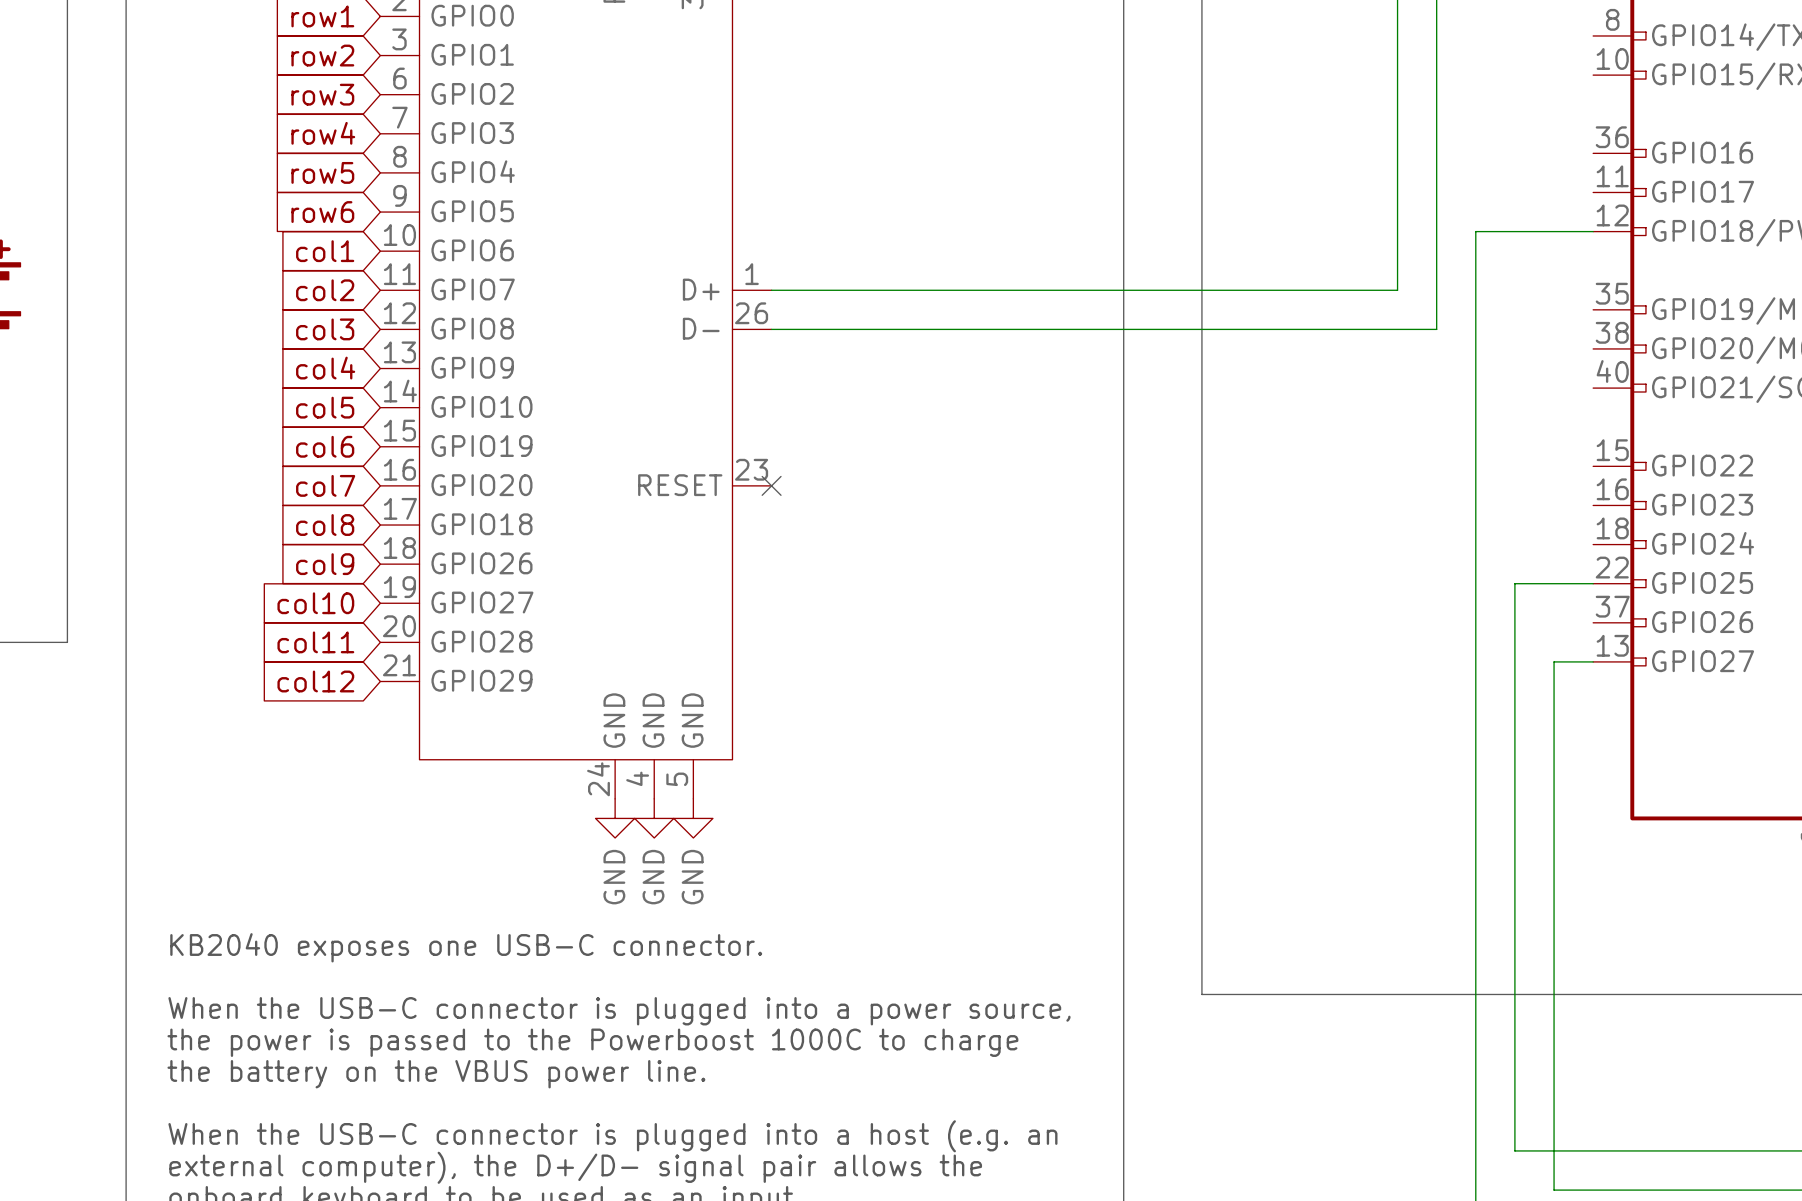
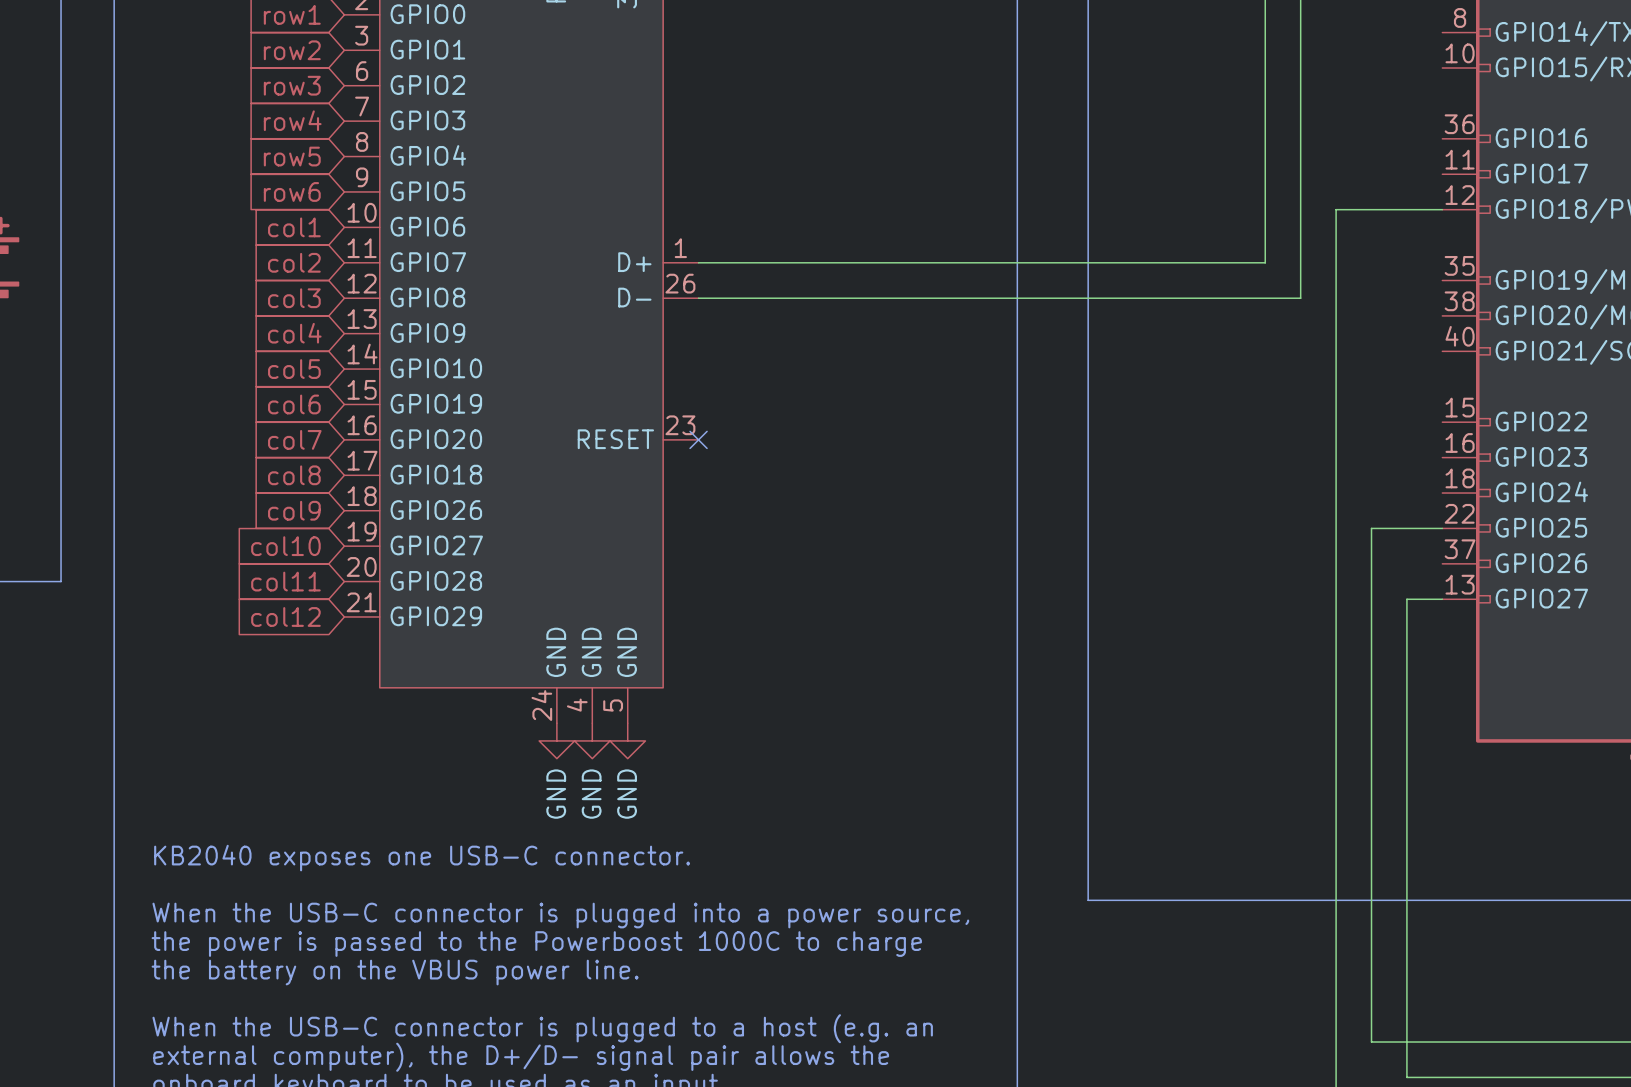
text: When the USB-C connector is plugged into a host (e.g. an (612, 1136) -> When the USB-C connector is plugged to a host (e.g. an (542, 1028)

